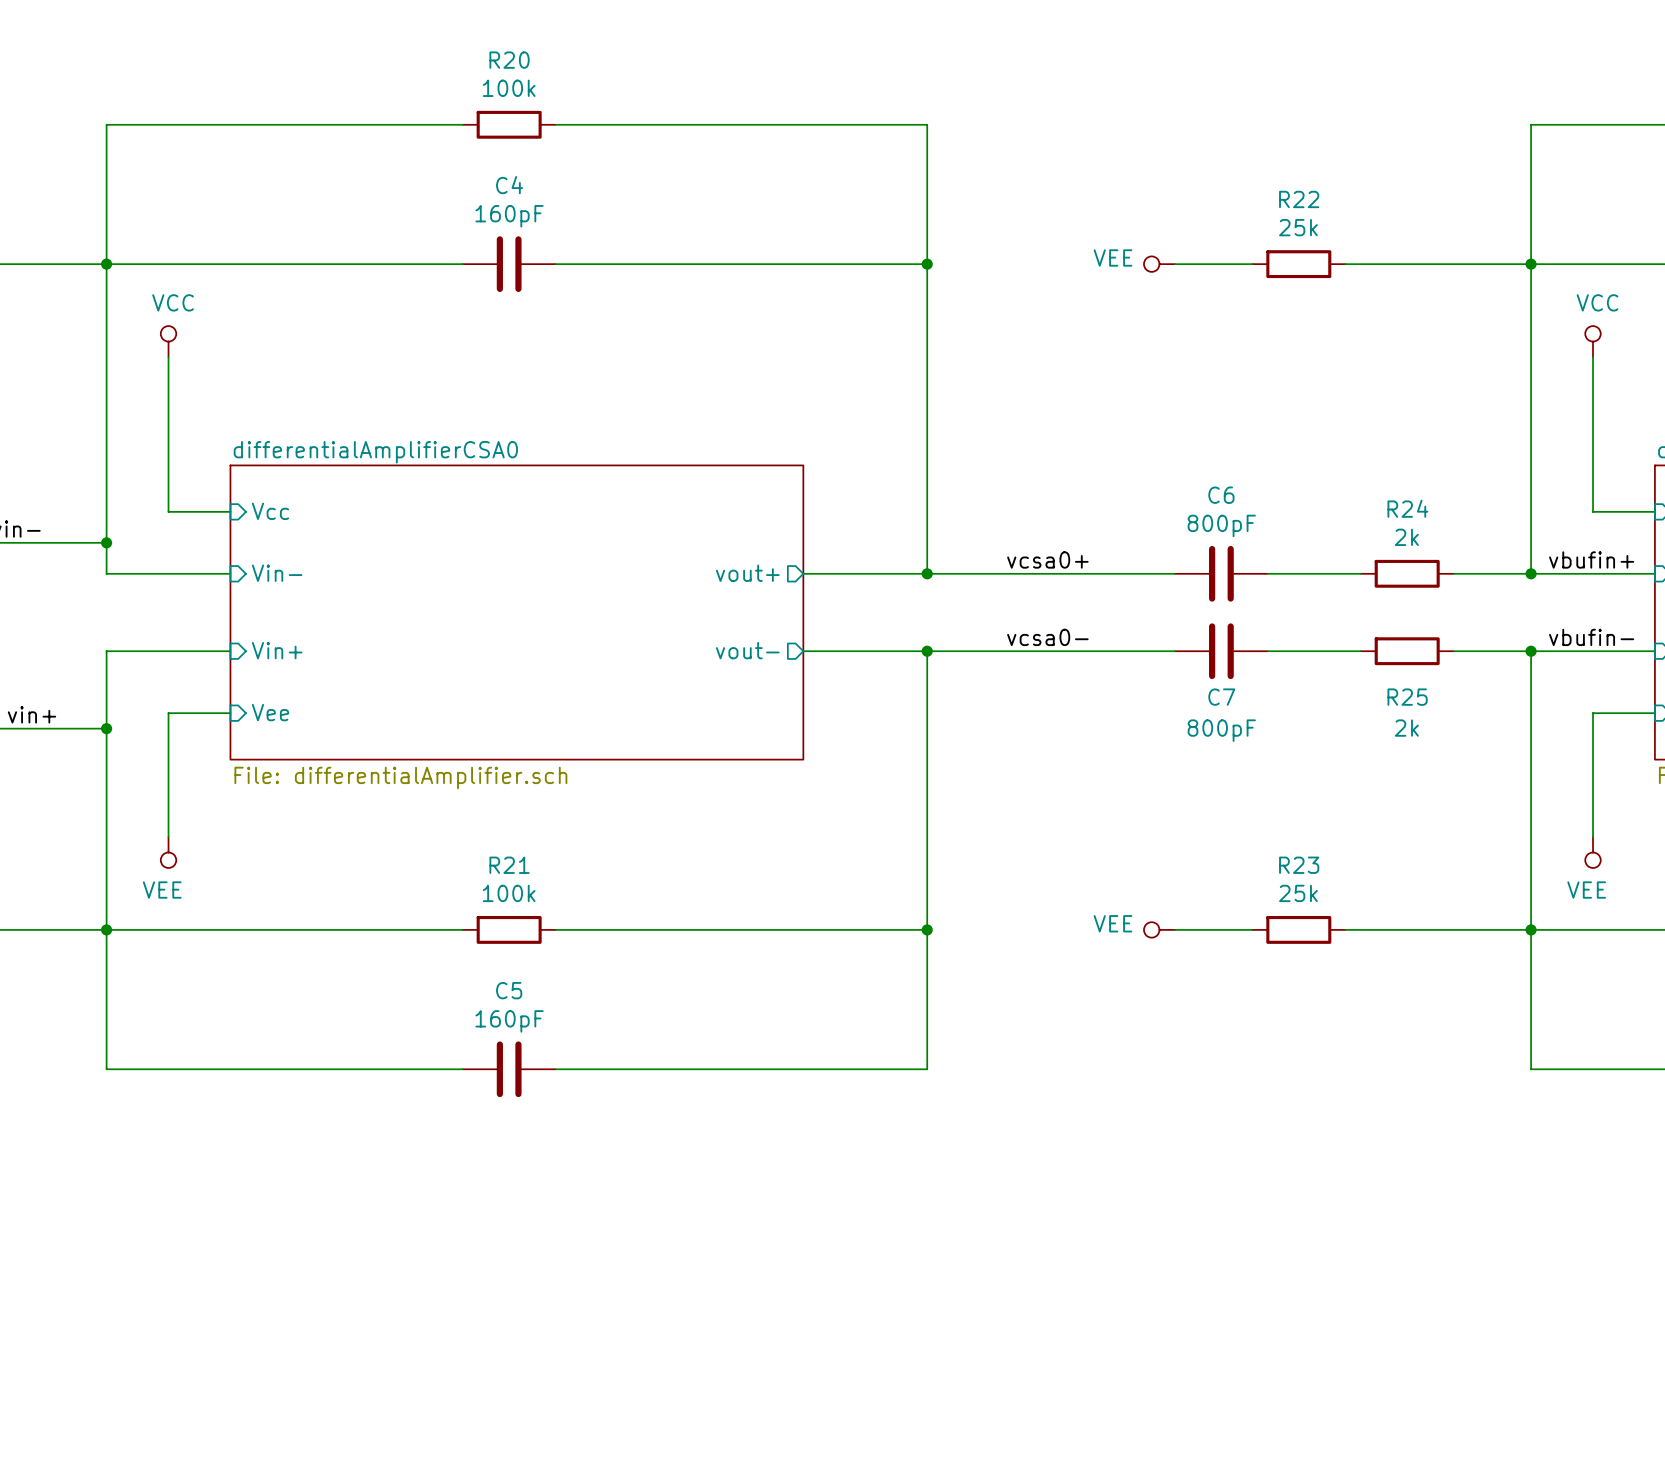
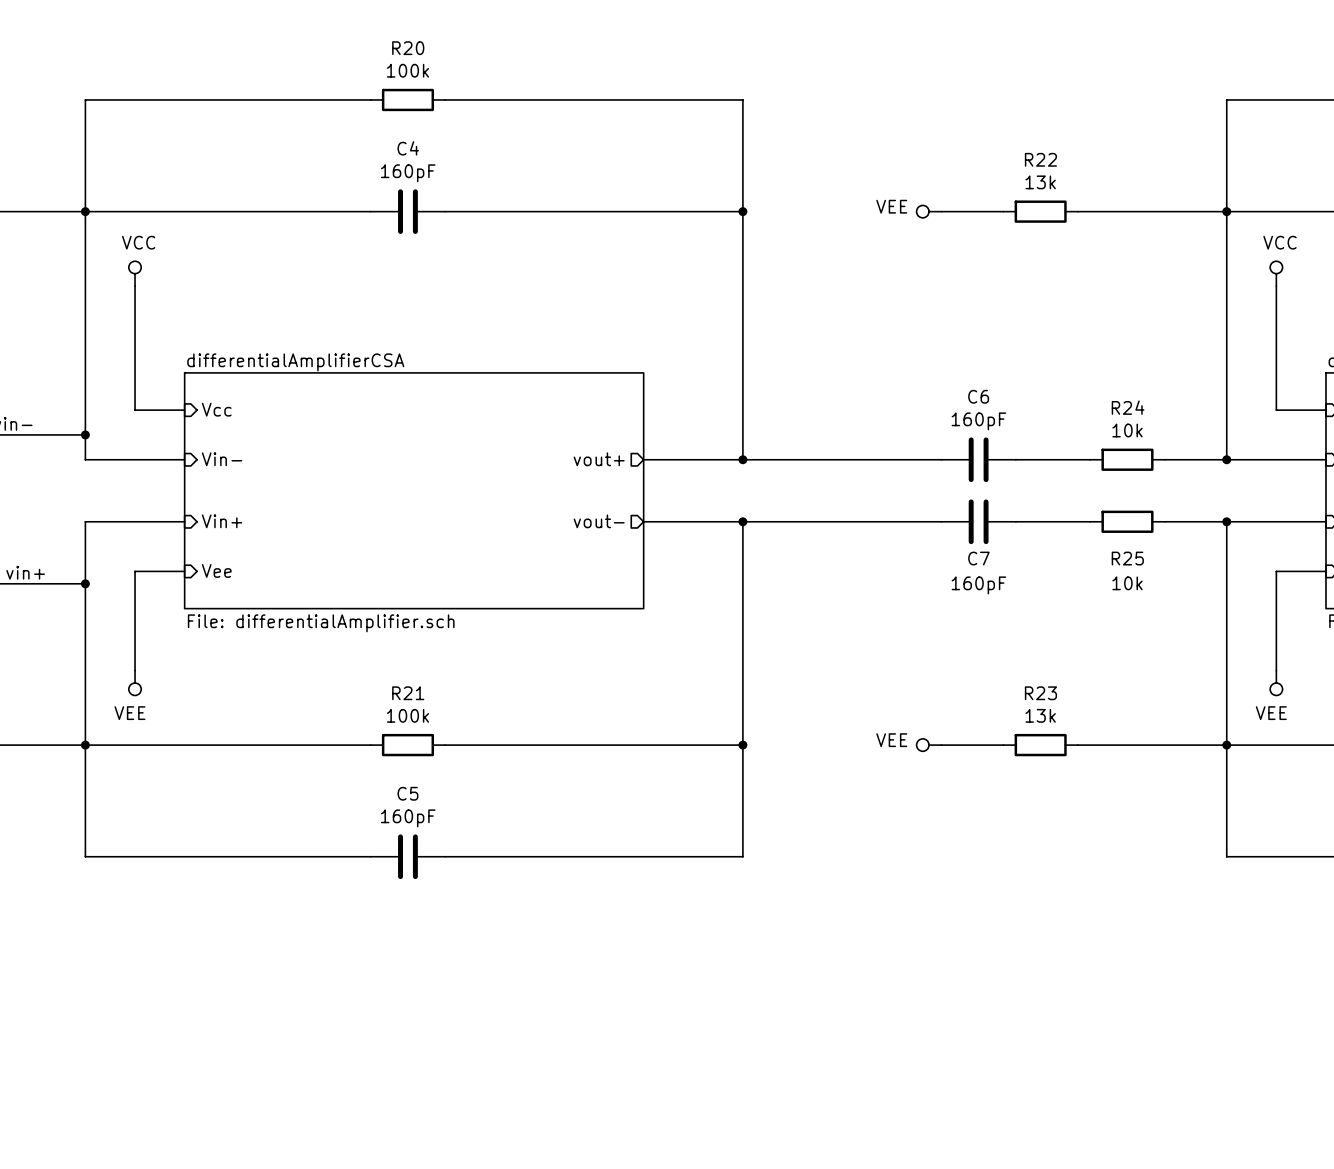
R22 value: 25k (1298, 227) -> 13k (1040, 182)
sheet differentialAmplifierCSA0 name: differentialAmplifierCSA0 (375, 452) -> differentialAmplifierCSA (295, 362)
C6 value: 800pF (1221, 525) -> 160pF (978, 421)
R24 value: 2k (1406, 537) -> 10k (1127, 430)
label: vcsa0+ (1047, 559) -> none
label: vbufin+ (1591, 559) -> none
label: vcsa0- (1047, 637) -> none
label: vbufin- (1591, 637) -> none
R25 value: 2k (1406, 728) -> 10k (1127, 583)
C7 value: 800pF (1221, 730) -> 160pF (978, 585)
R23 value: 25k (1298, 893) -> 13k (1040, 715)

